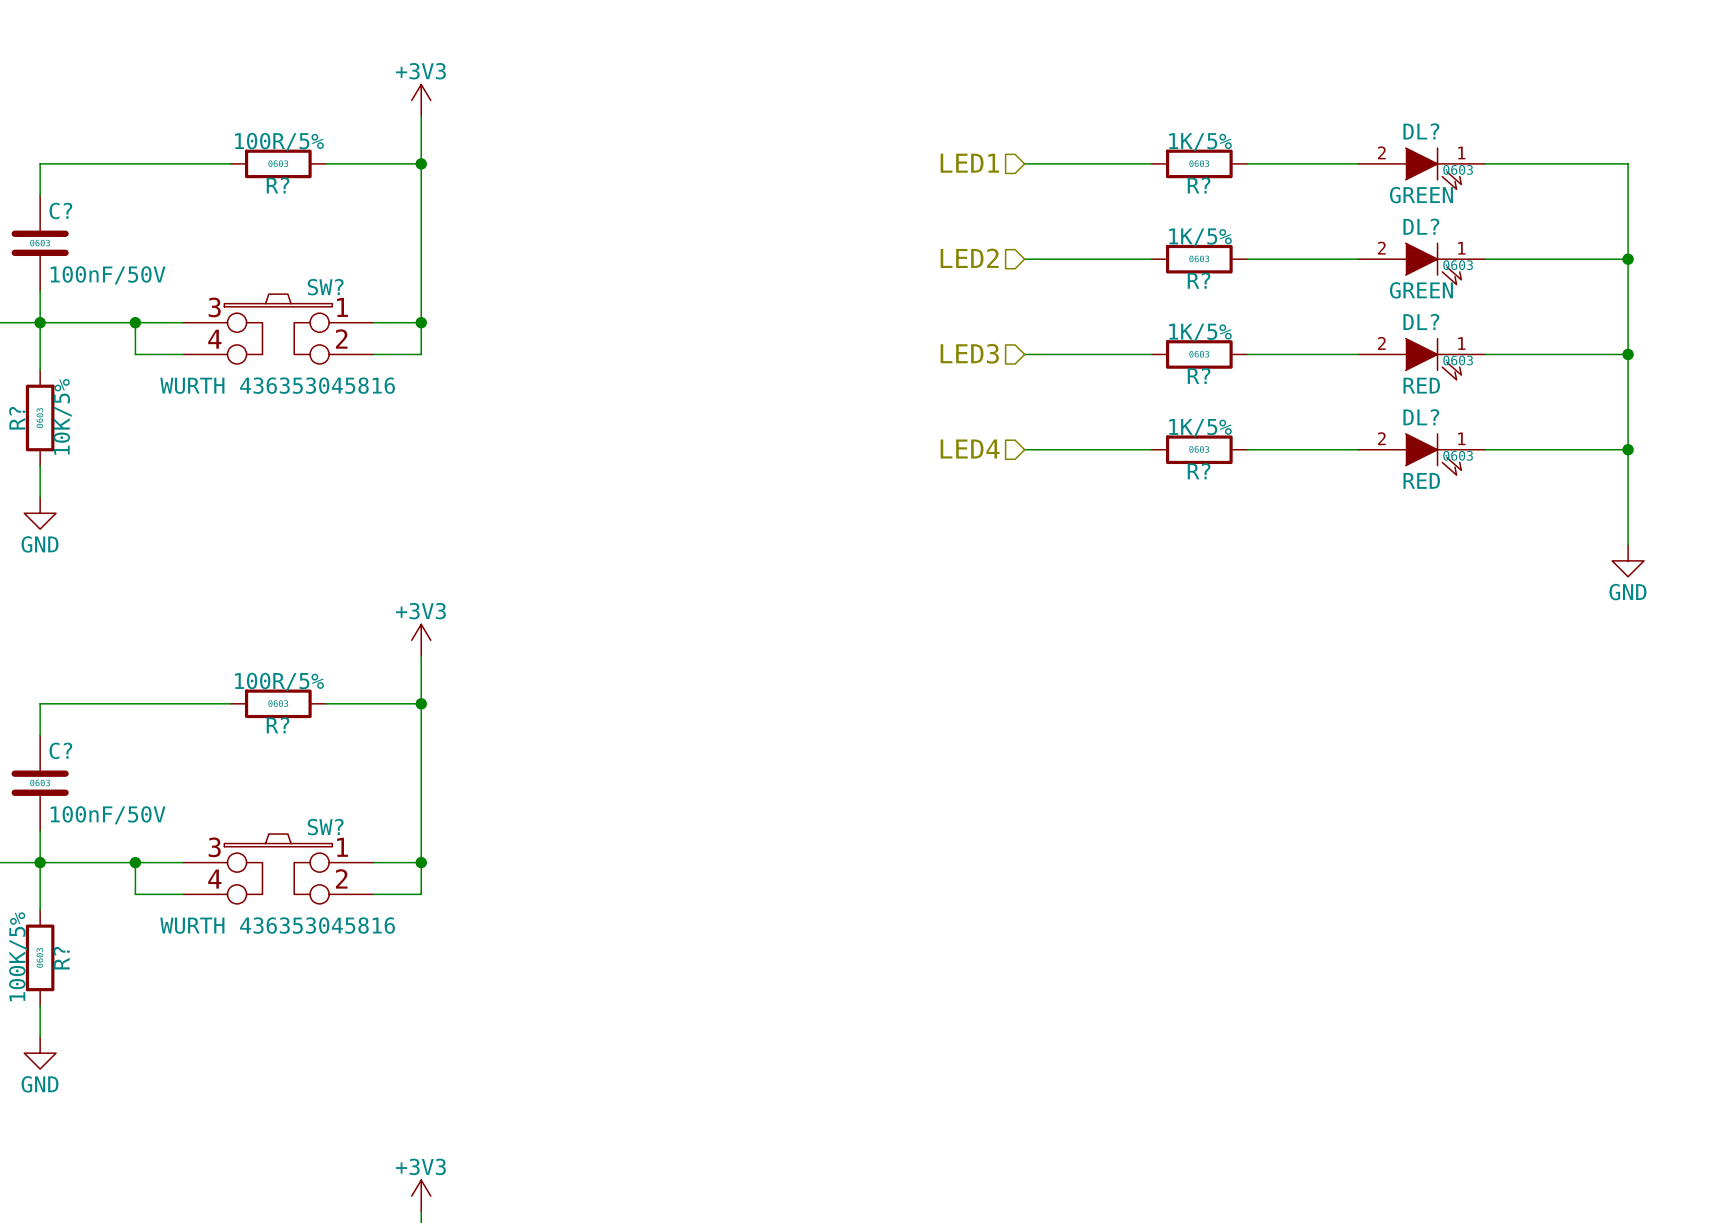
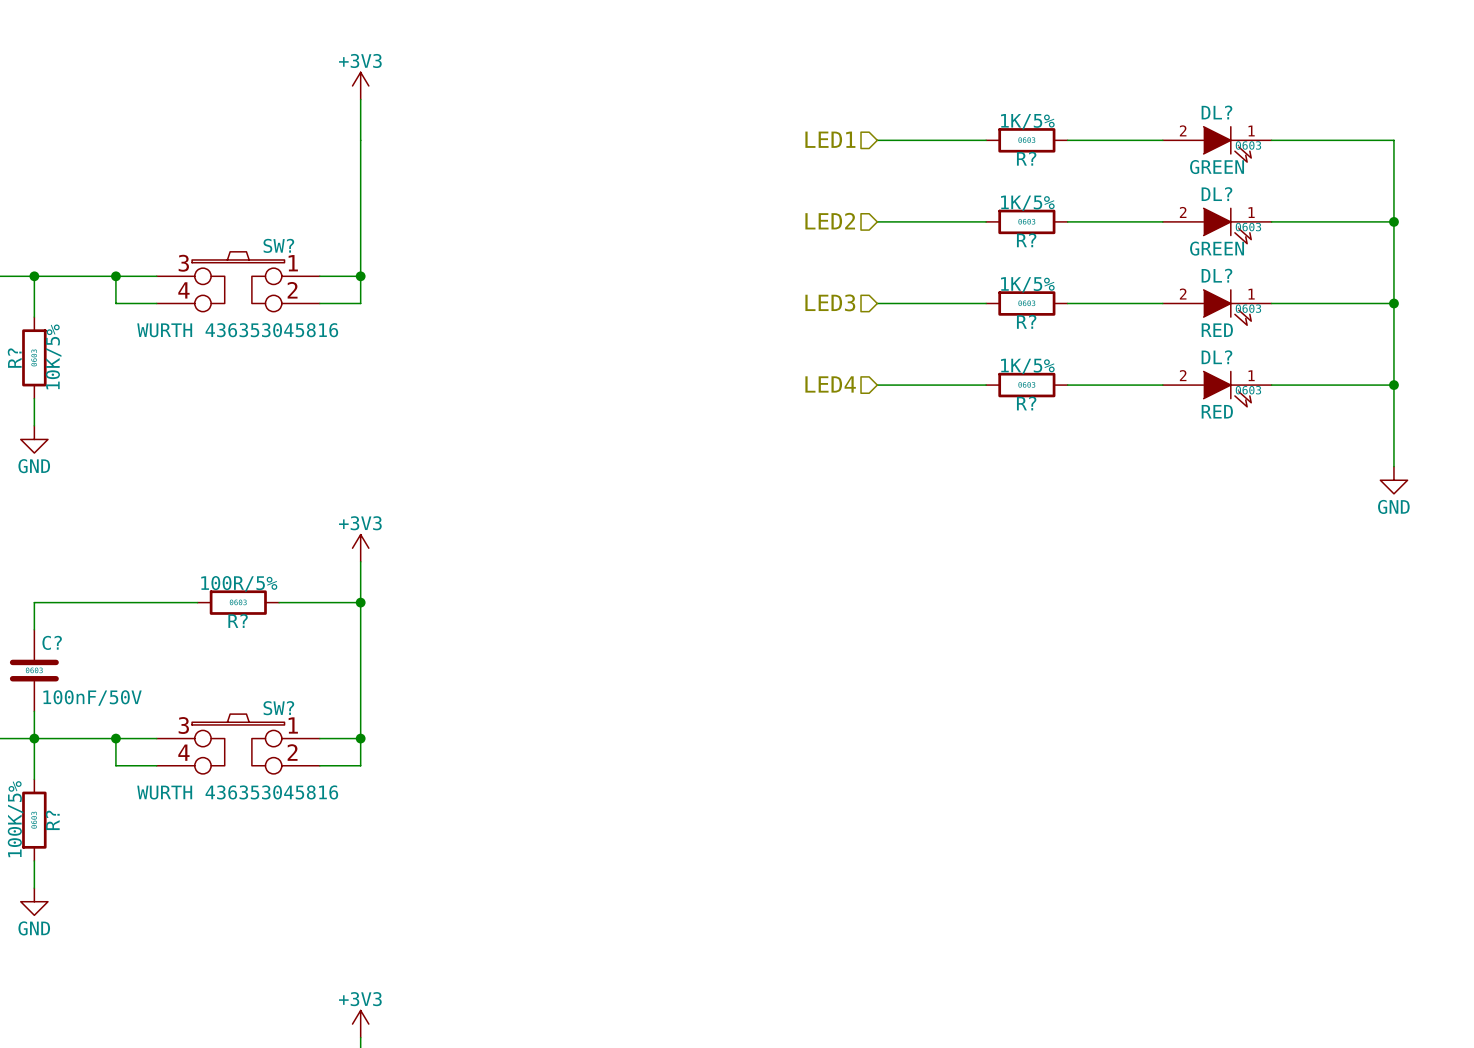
wire: (230, 163) (40, 163) (40, 195) -> none
R?: 100R/5% (278, 163) -> none
wire: (325, 163) (421, 163) -> none
junction: (421, 163) -> none
C?: 100nF/50V (40, 243) -> none
wire: (40, 290) (40, 322) -> none

